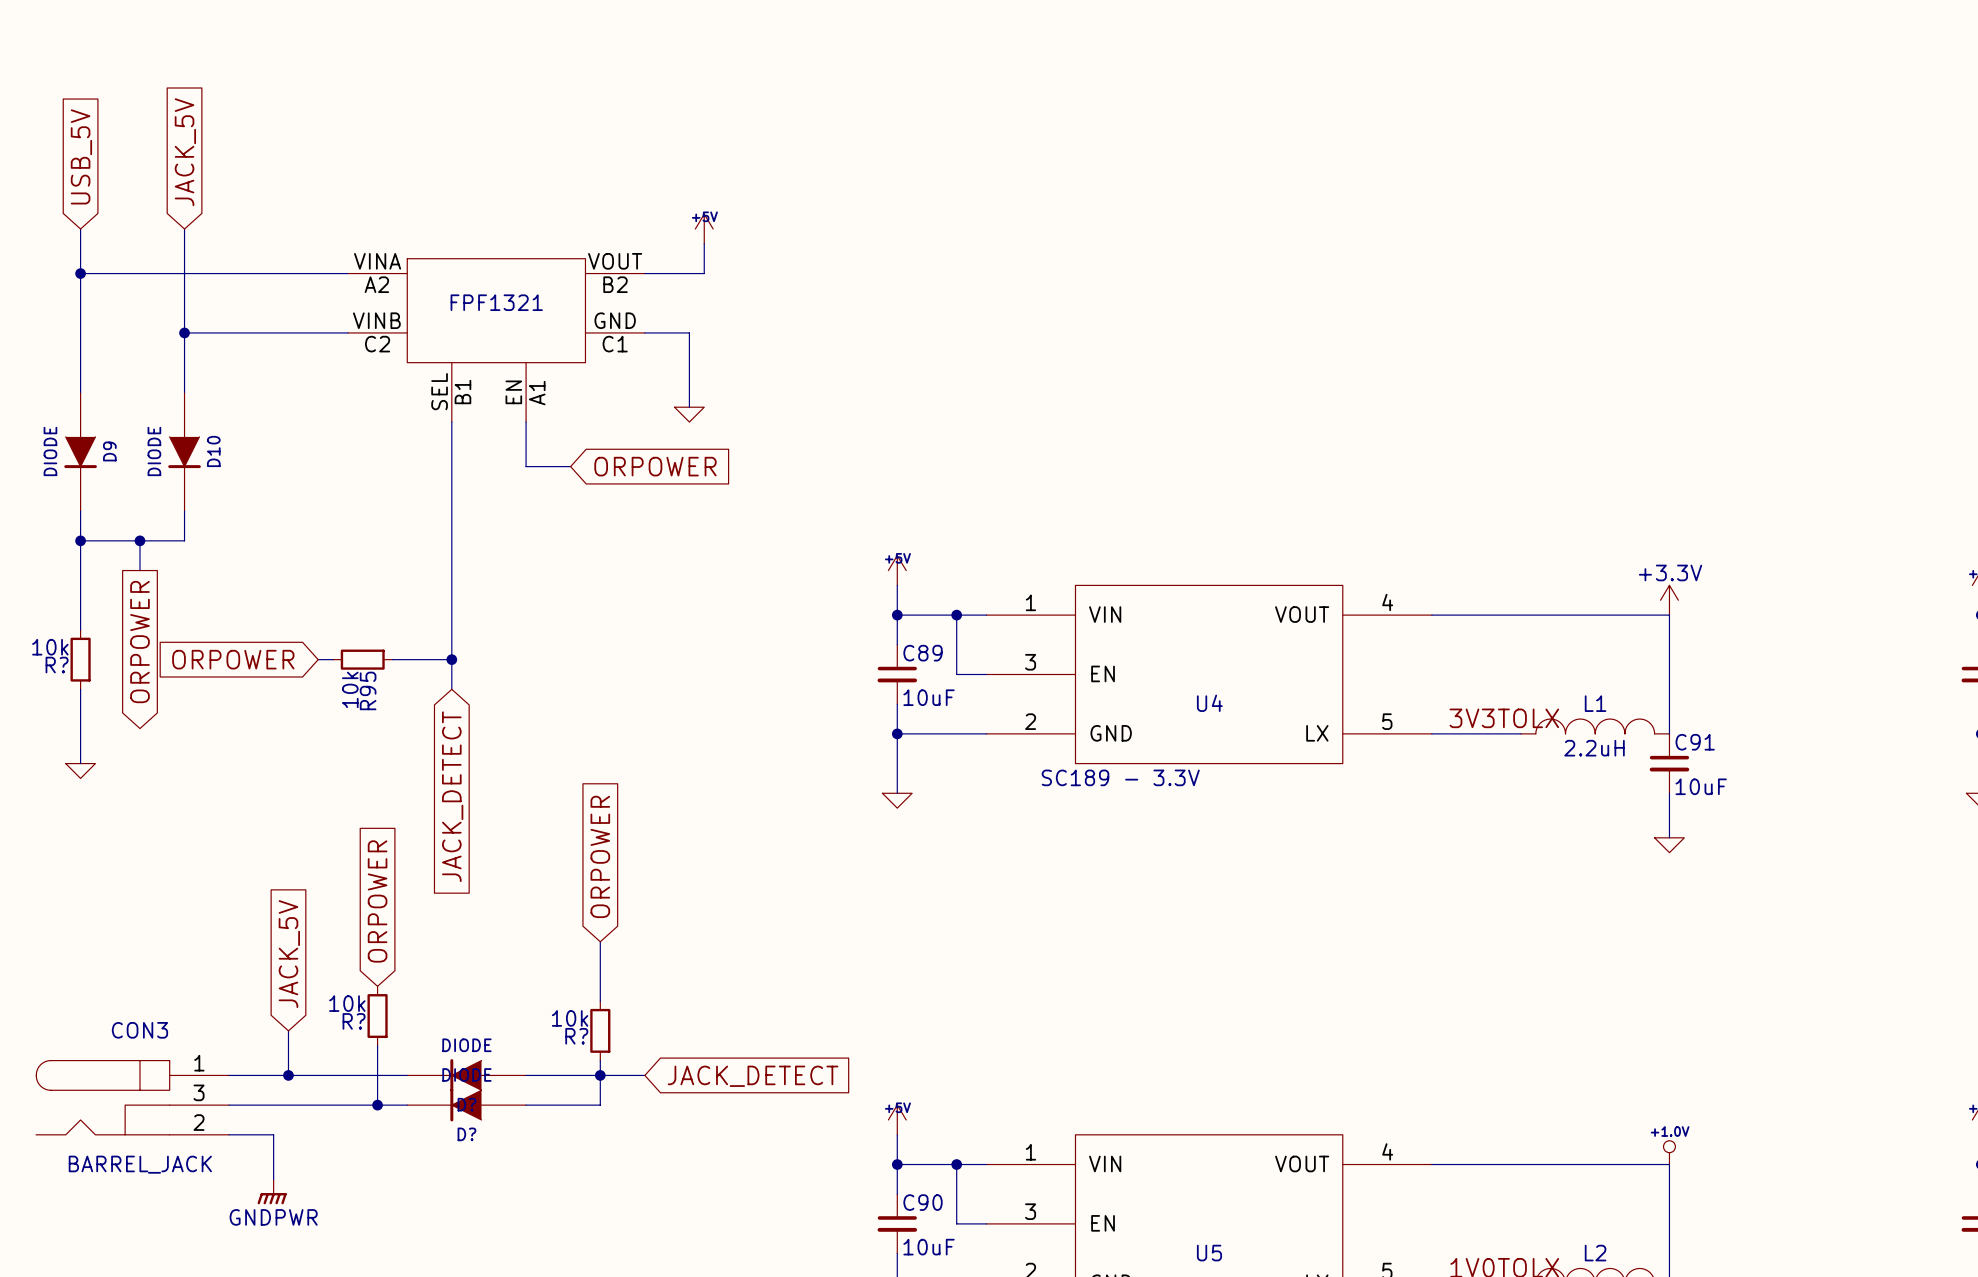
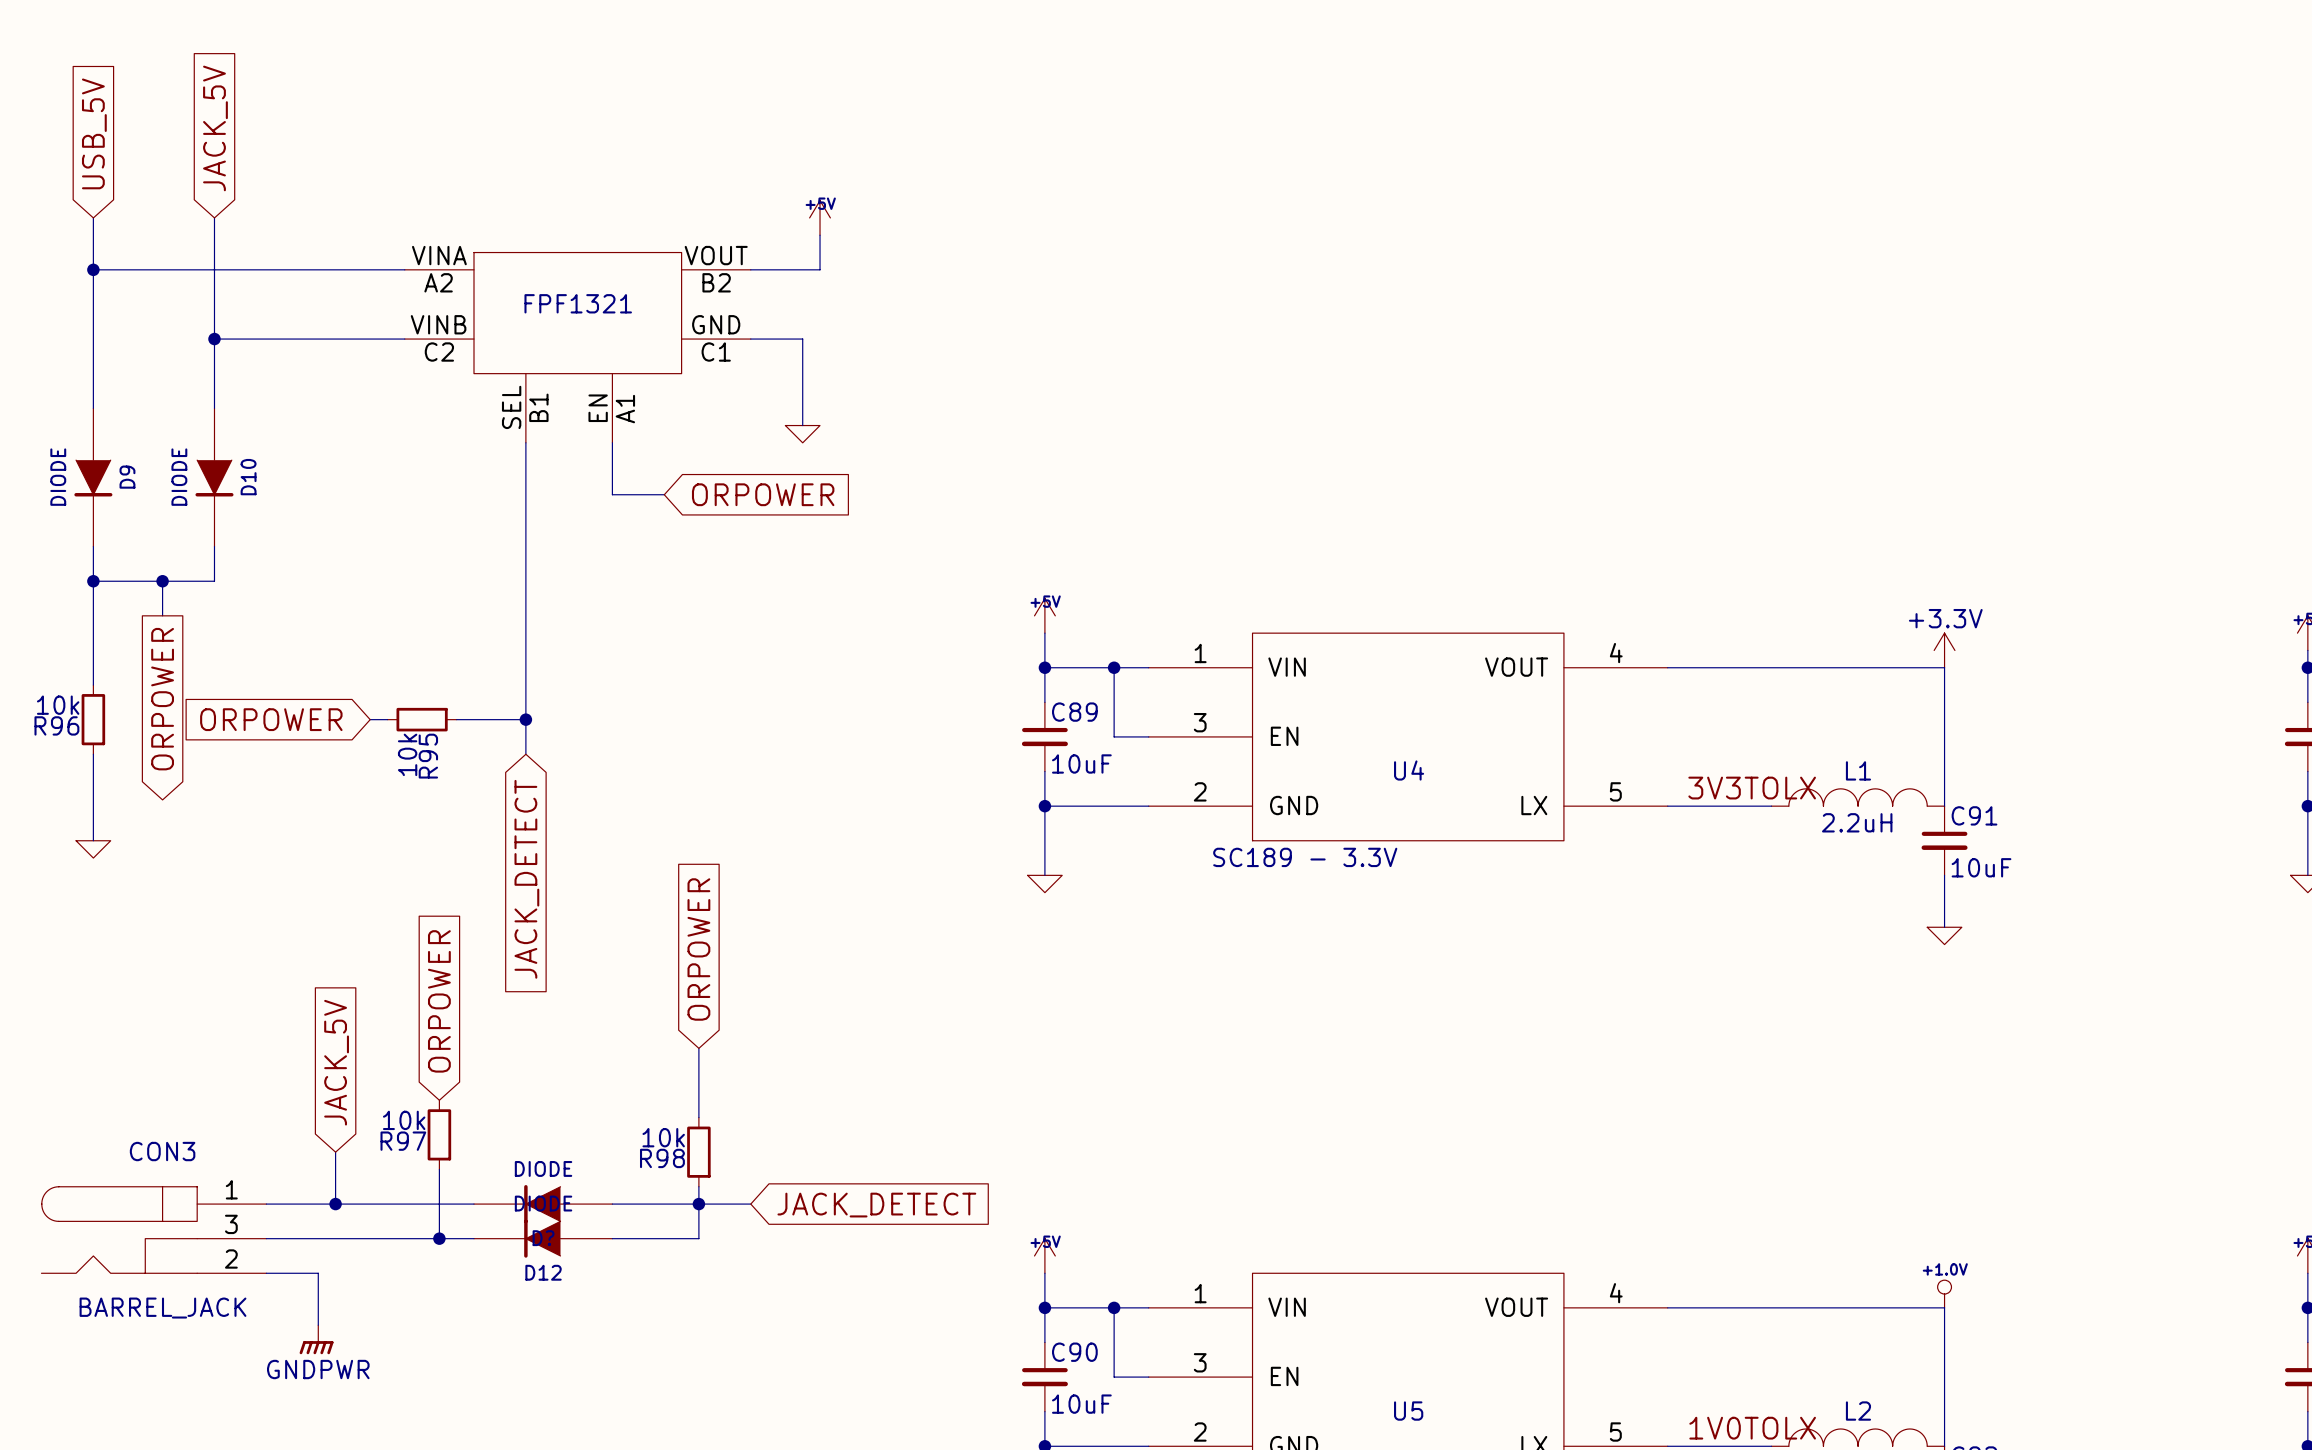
R? name: R? (57, 665) -> R96 (56, 725)
R? name: R? (354, 1021) -> R97 (403, 1141)
R? name: R? (576, 1036) -> R98 (662, 1158)
D? name: D? (466, 1134) -> D12 (543, 1272)

